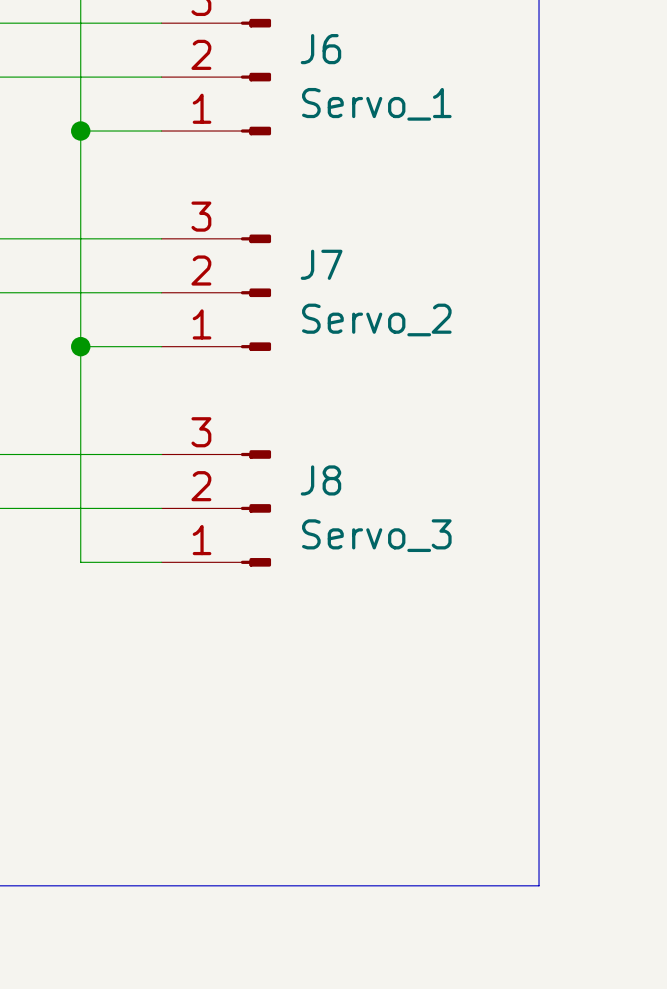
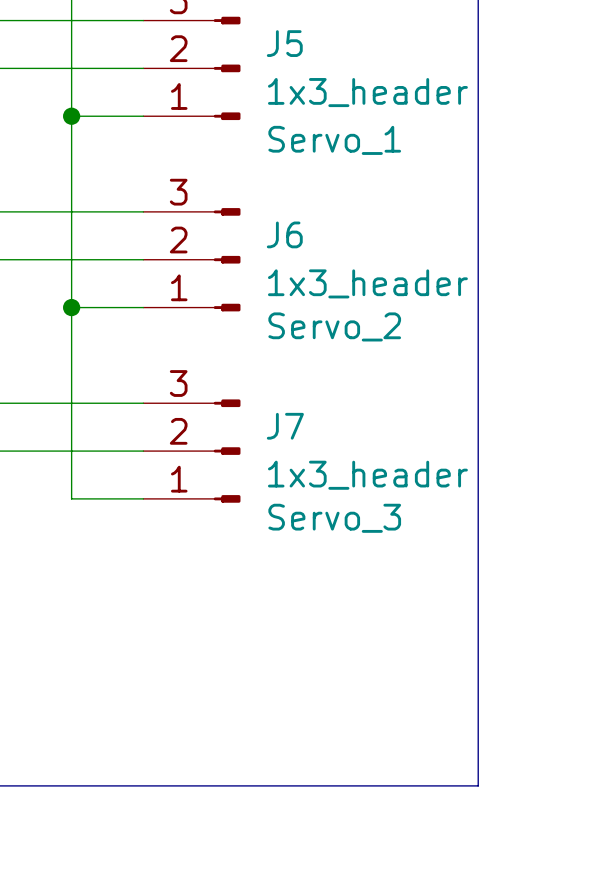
J6 name: J6 (320, 49) -> J5 (284, 43)
J6 value: Servo_1 (376, 104) -> 1x3_header (367, 92)
J6 text: none -> Servo_1 (334, 140)
J7 name: J7 (321, 264) -> J6 (284, 234)
J7 value: Servo_2 (376, 319) -> 1x3_header (367, 283)
J7 text: none -> Servo_2 (334, 326)
J8 name: J8 (320, 480) -> J7 (285, 426)
J8 value: Servo_3 (376, 535) -> 1x3_header (367, 475)
J8 text: none -> Servo_3 (334, 518)

